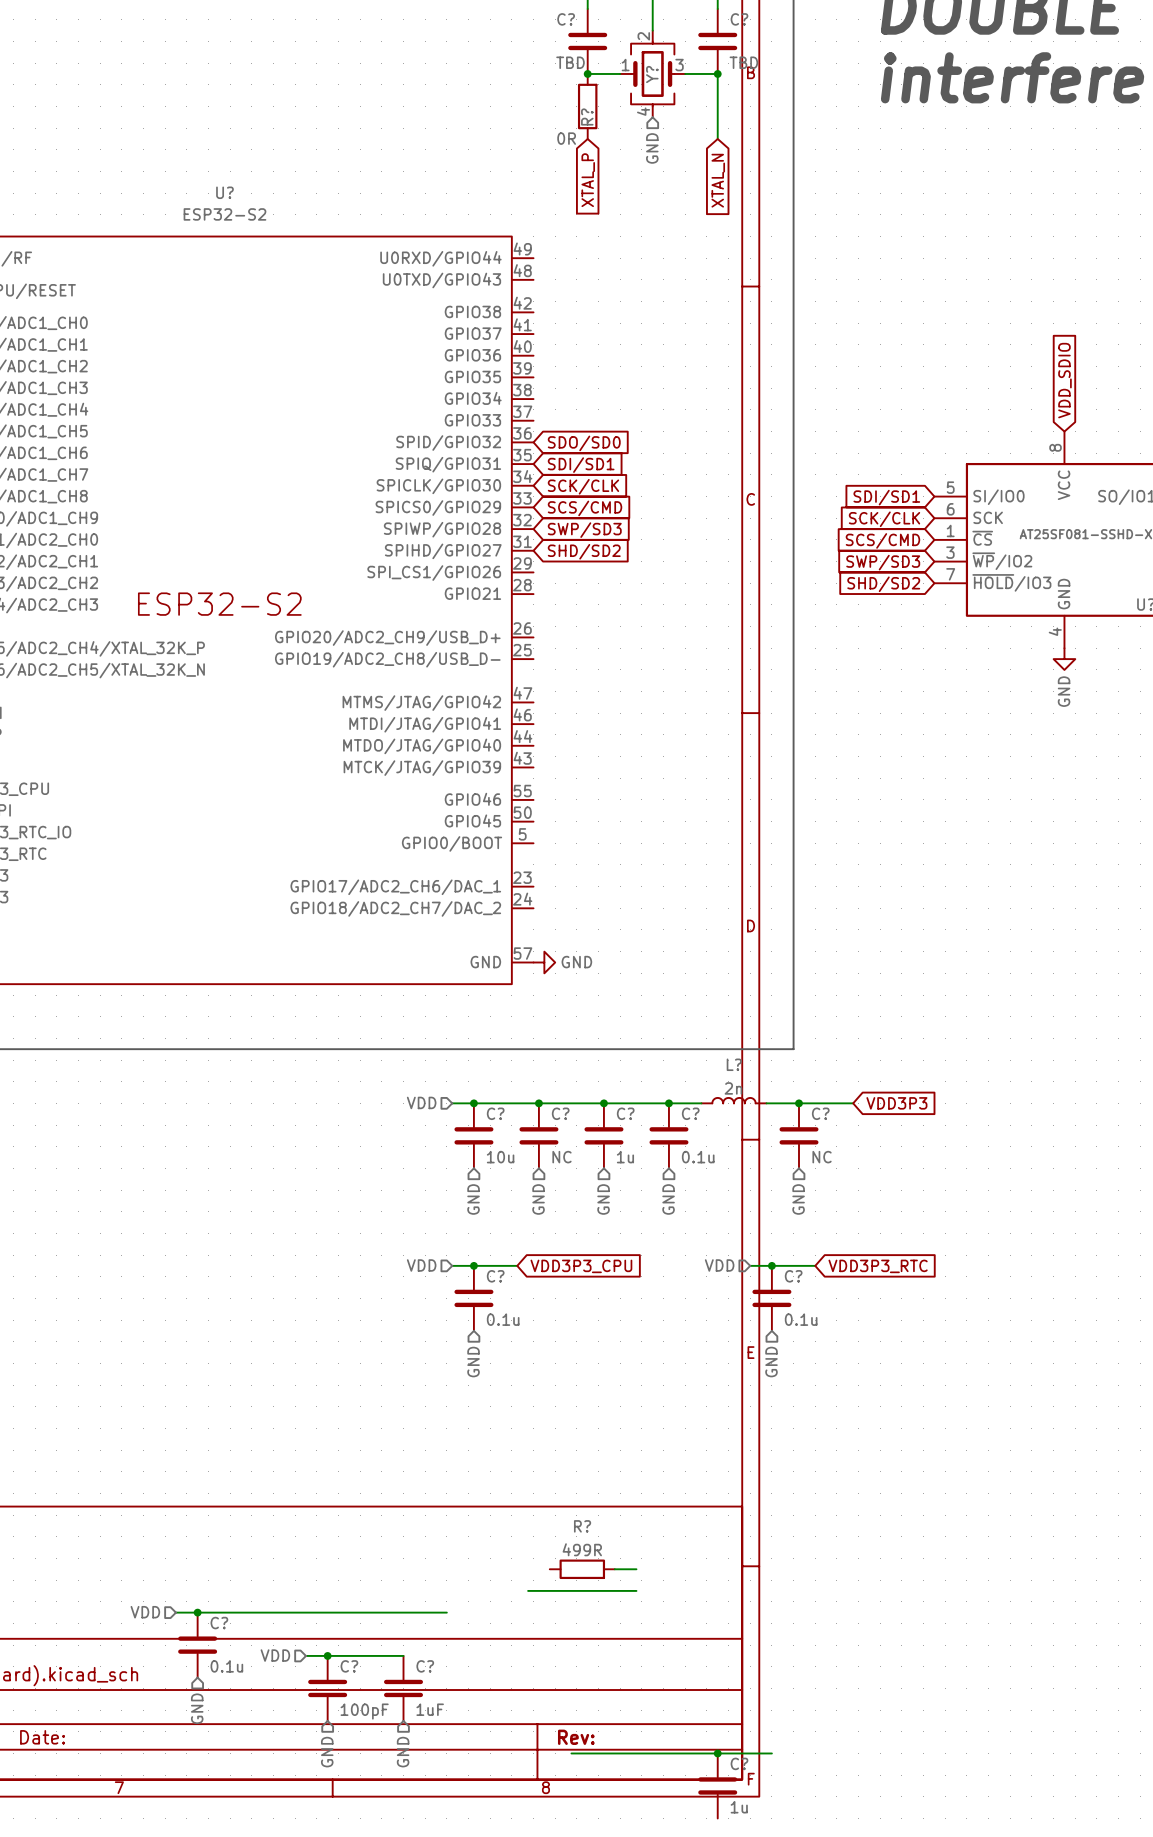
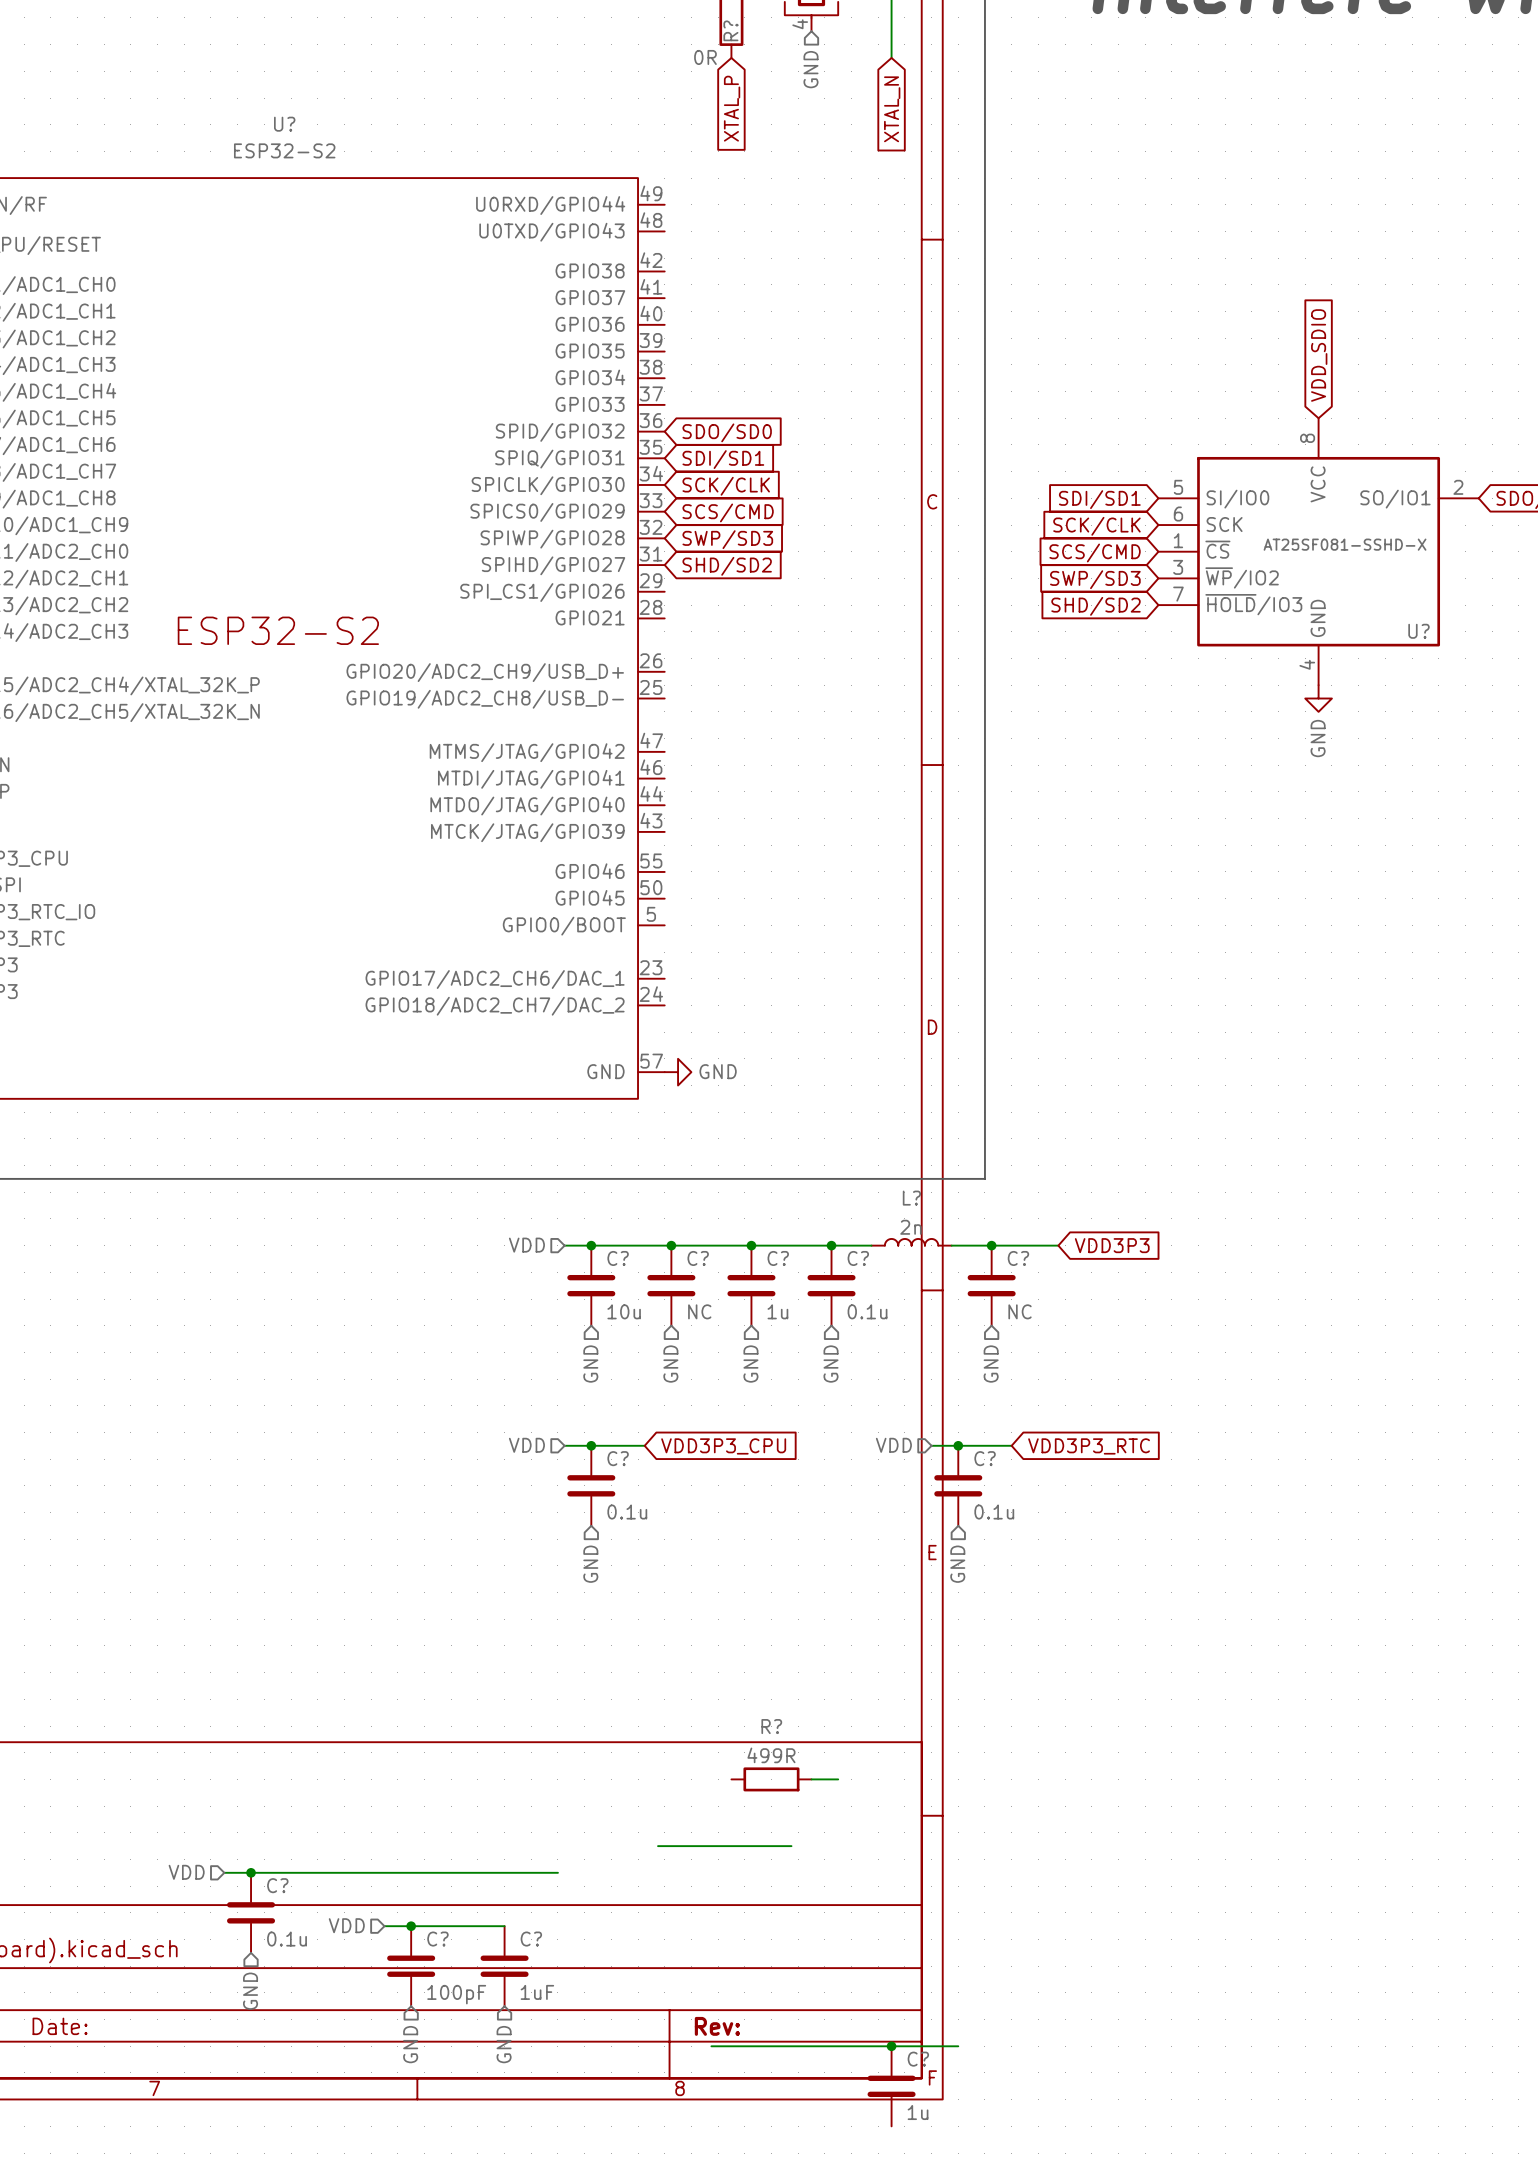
R? position: (582, 1569) -> (771, 1779)
wire: (614, 1569) (636, 1569) -> (811, 1779) (838, 1779)

